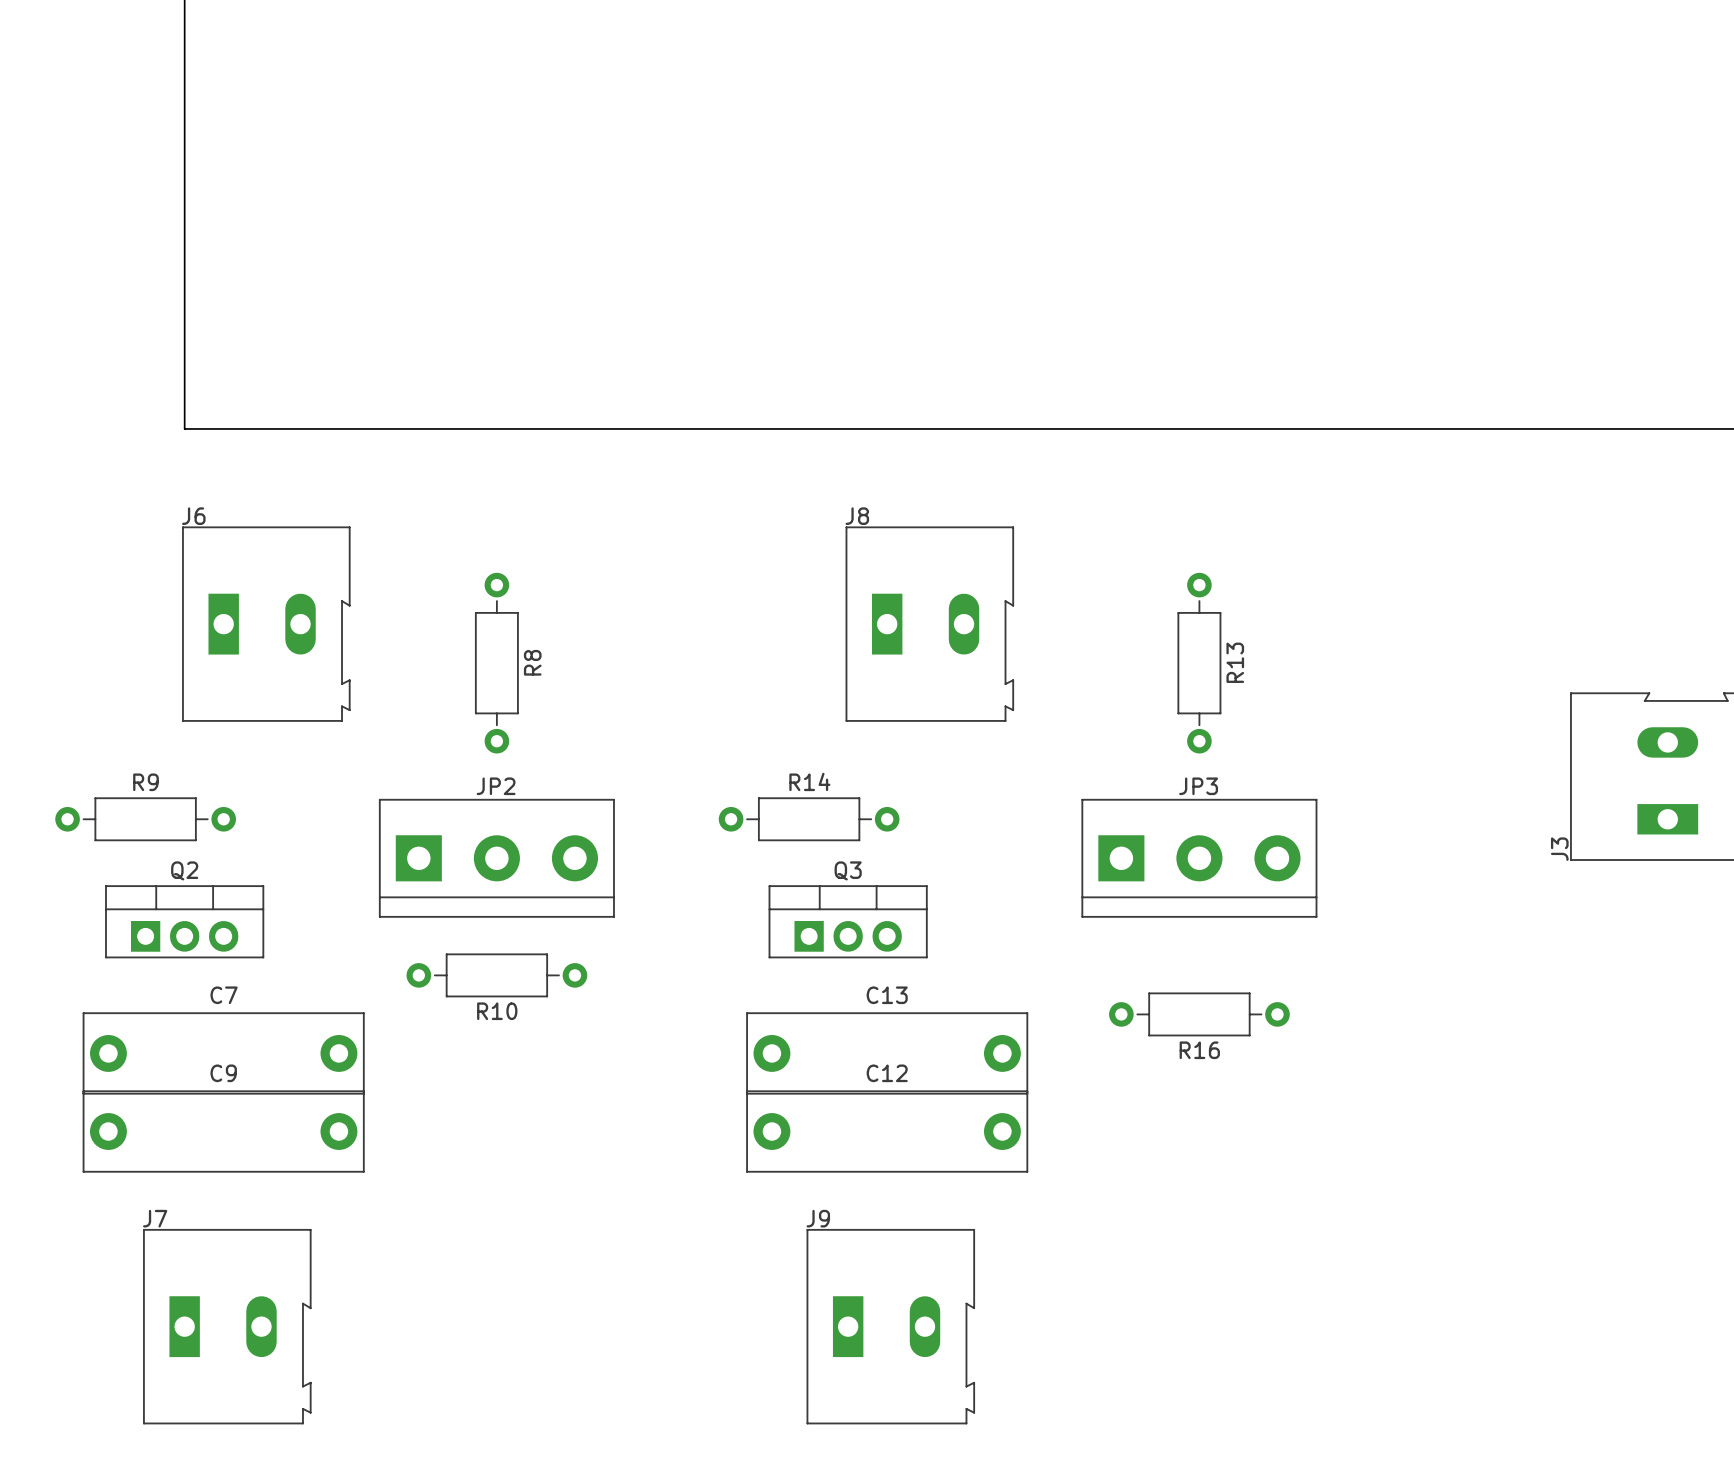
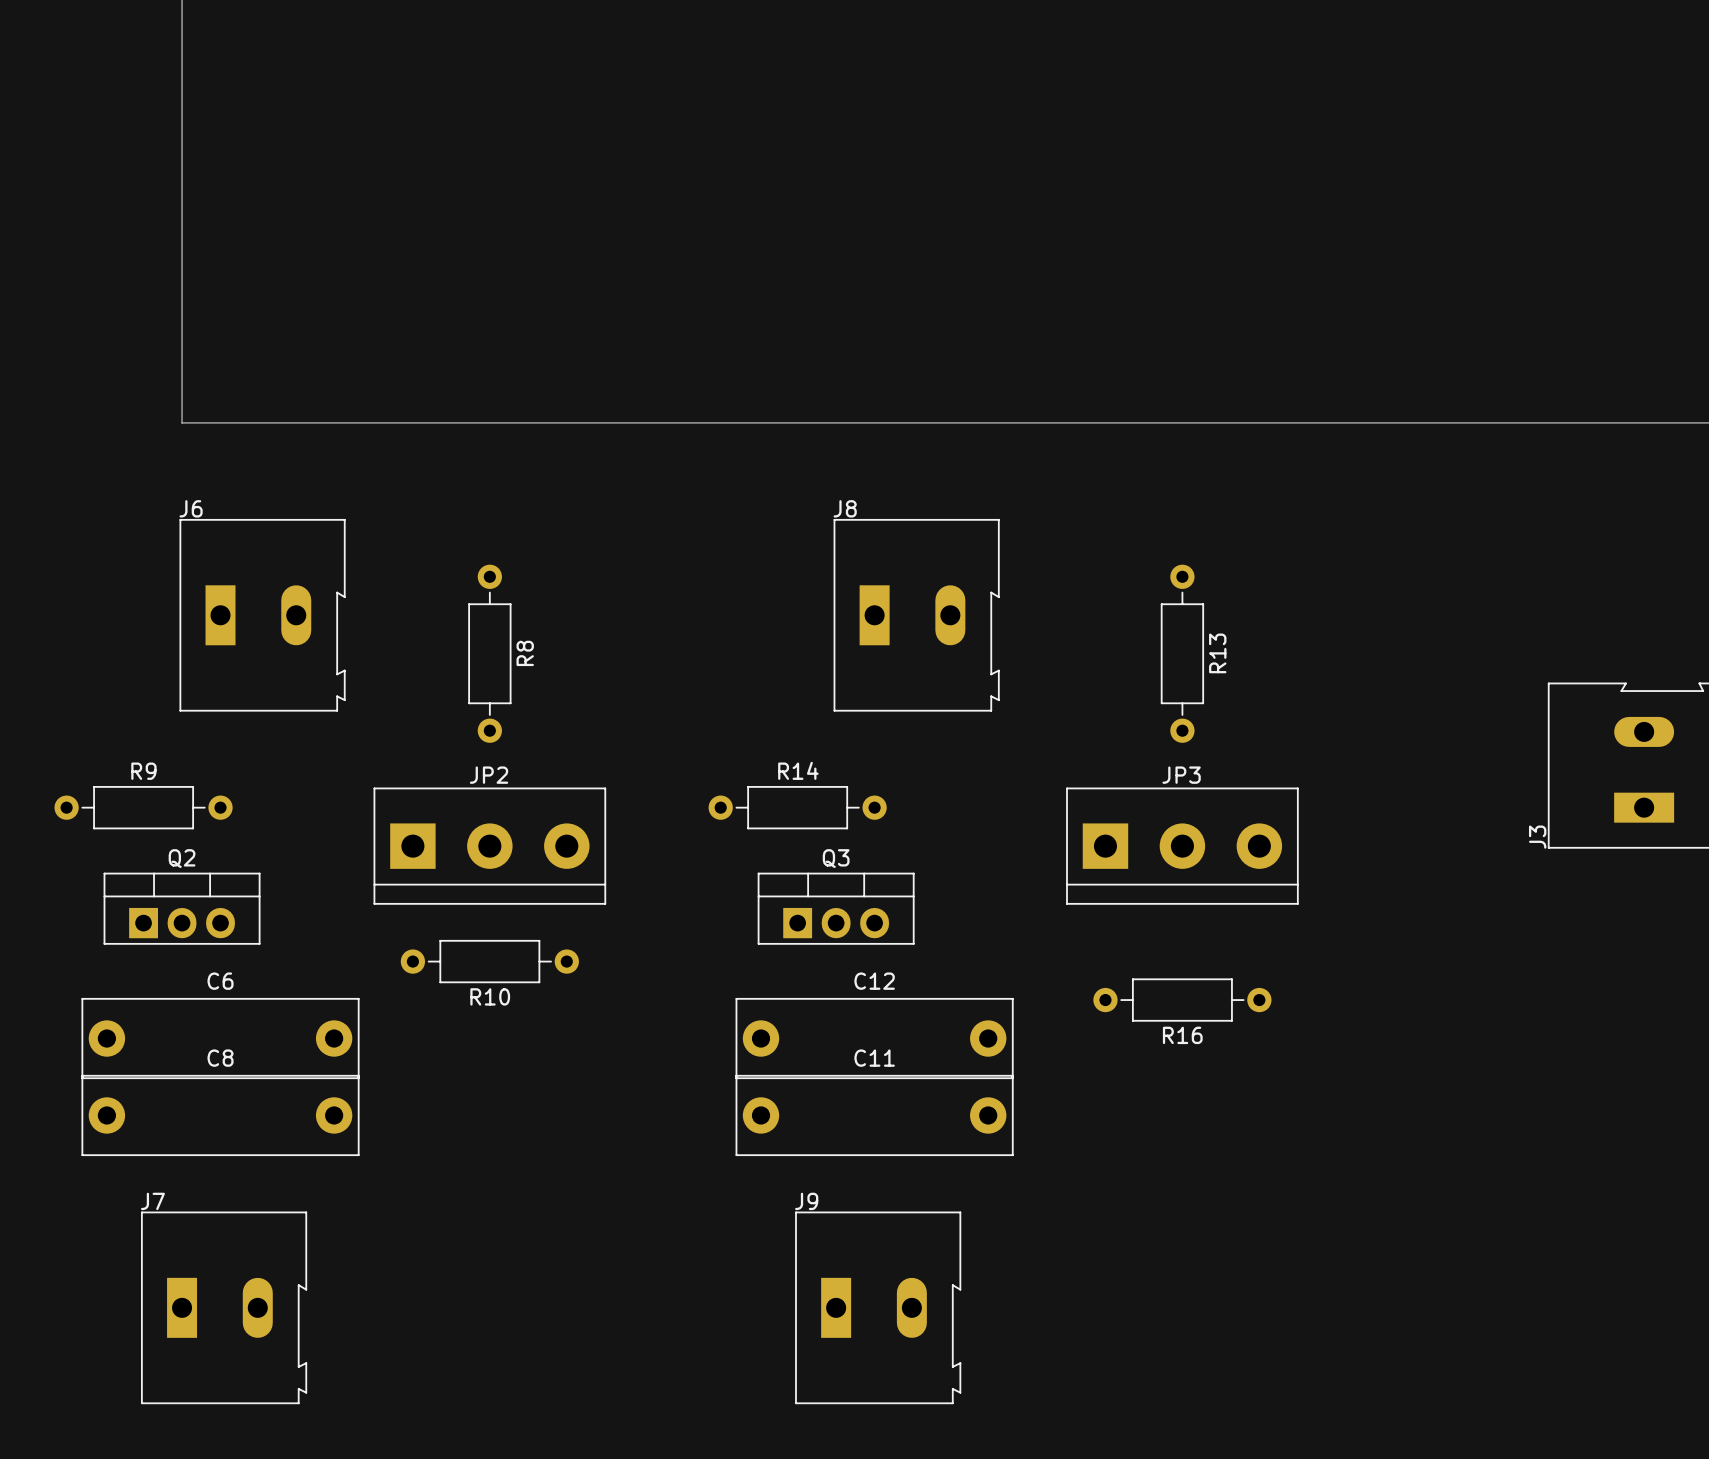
C7 name: C7 (224, 995) -> C6 (220, 981)
C13 name: C13 (887, 995) -> C12 (874, 981)
C9 name: C9 (223, 1073) -> C8 (220, 1058)
C12 name: C12 (887, 1073) -> C11 (874, 1058)

